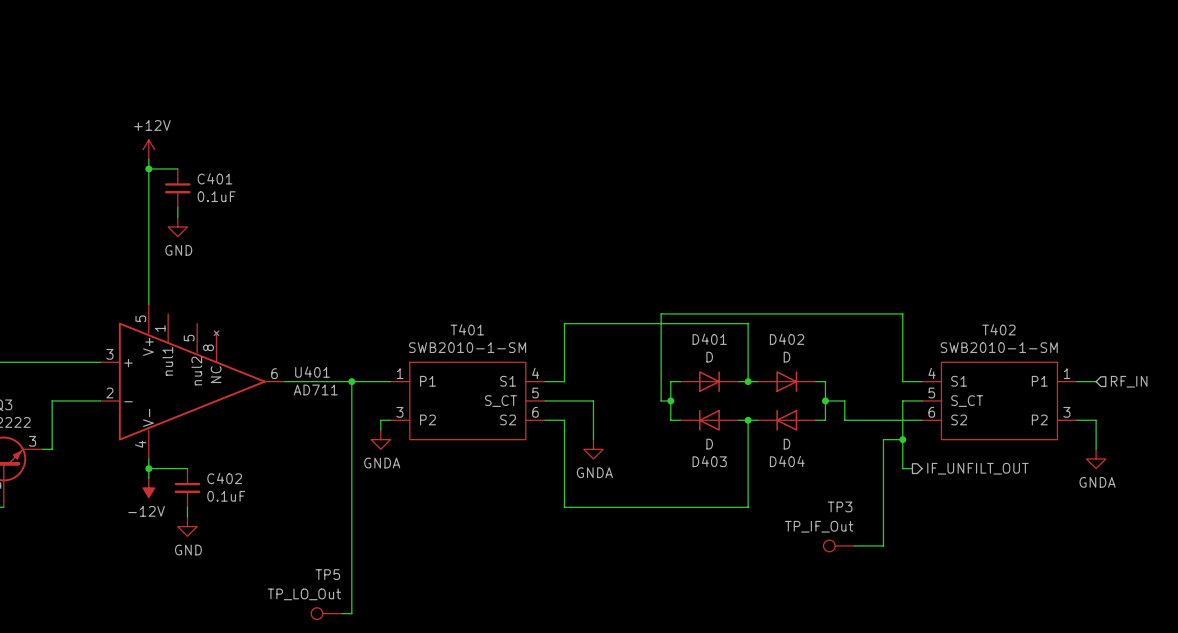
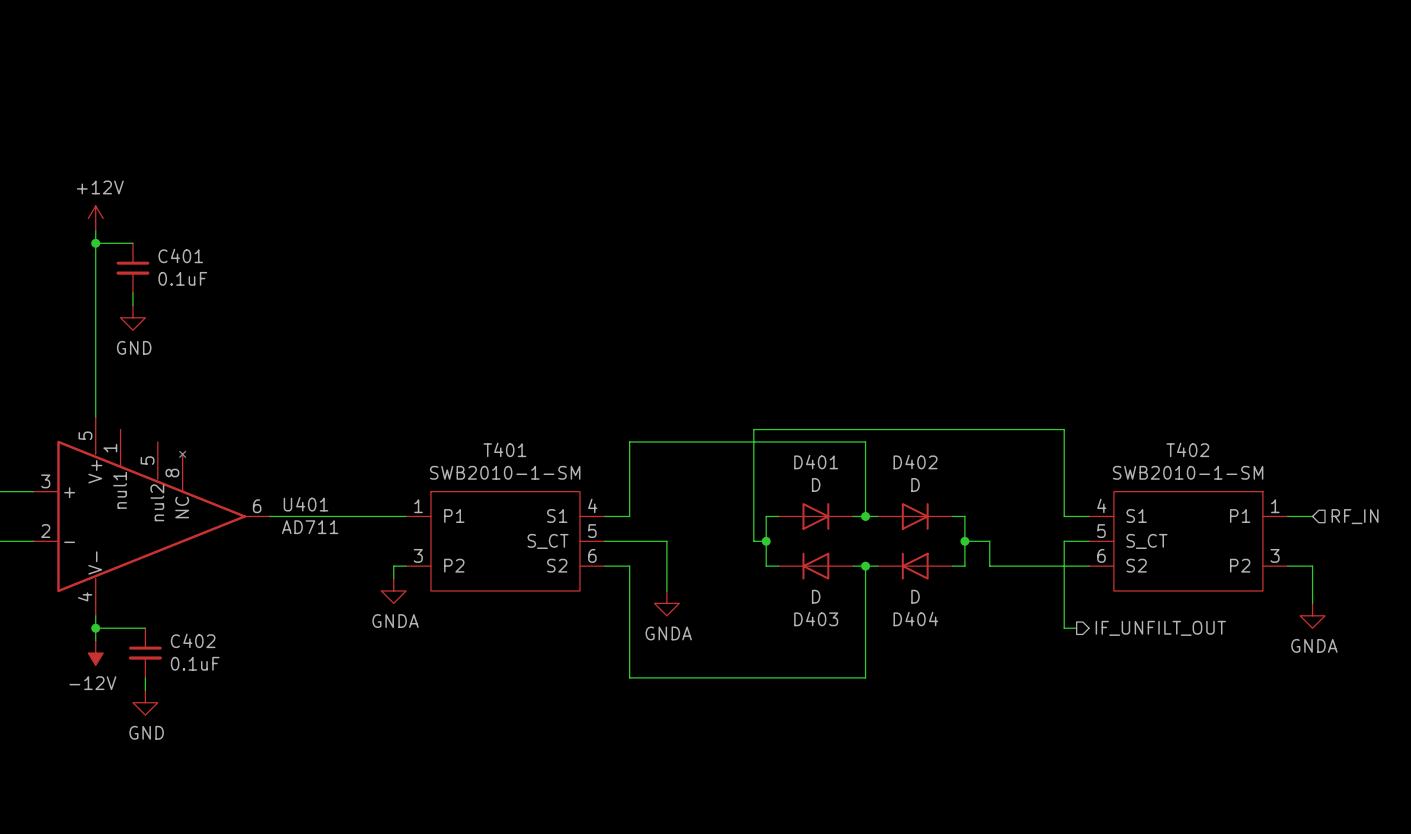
wire: (351, 381) (351, 613) (342, 613) -> none
junction: (351, 381) -> none
wire: (902, 439) (883, 439) (883, 545) (854, 545) -> none
junction: (902, 439) -> none
TP3: TP_IF_Out (838, 545) -> none
TP5: TP_LO_Out (326, 613) -> none

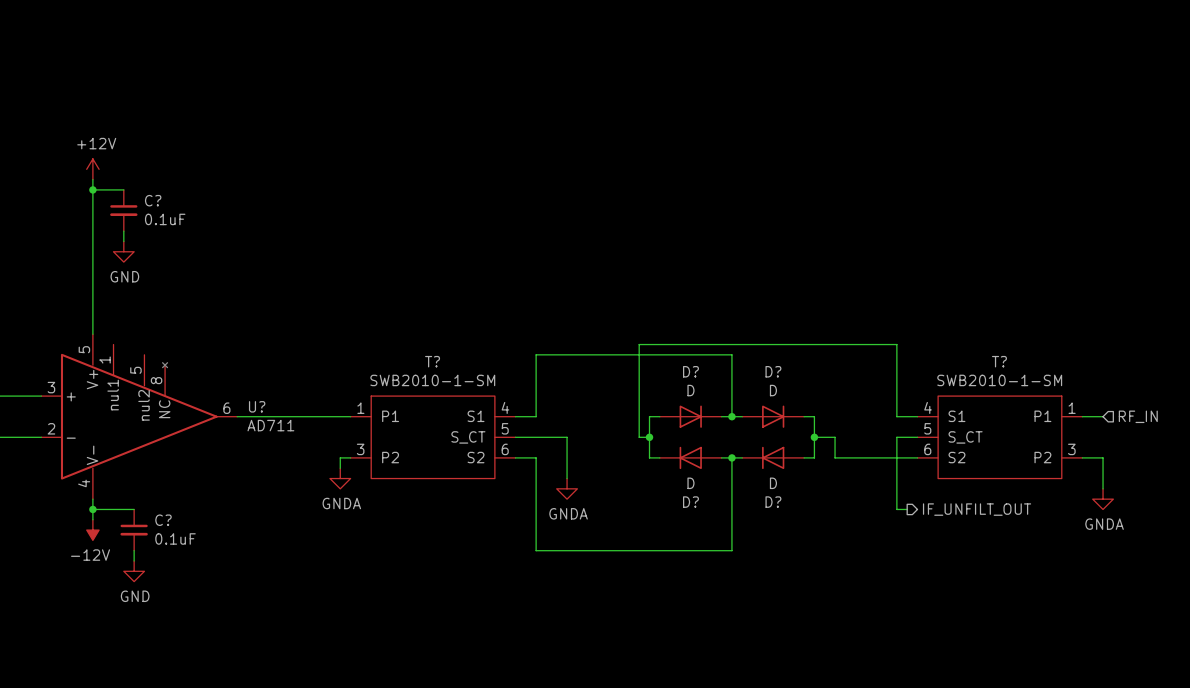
C401 name: C401 (180, 255) -> C? (153, 200)
T401 name: T401 (504, 449) -> T? (432, 361)
T402 name: T402 (1187, 449) -> T? (999, 361)
D401 name: D401 (816, 462) -> D? (690, 371)
D402 name: D402 (915, 462) -> D? (773, 371)
U401 name: U401 (305, 504) -> U? (257, 406)
D403 name: D403 (816, 619) -> D? (690, 502)
D404 name: D404 (915, 619) -> D? (773, 502)
C402 name: C402 (193, 640) -> C? (163, 520)

